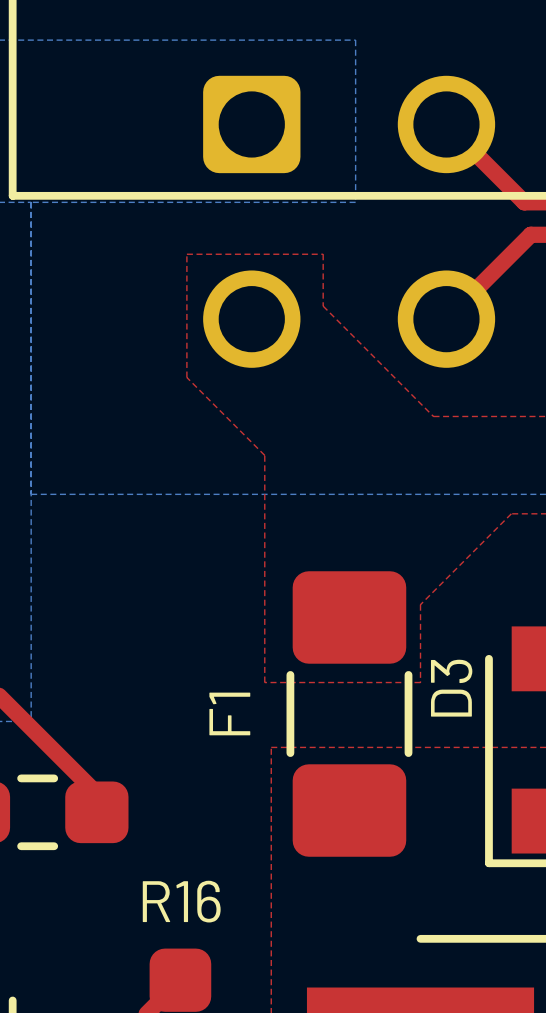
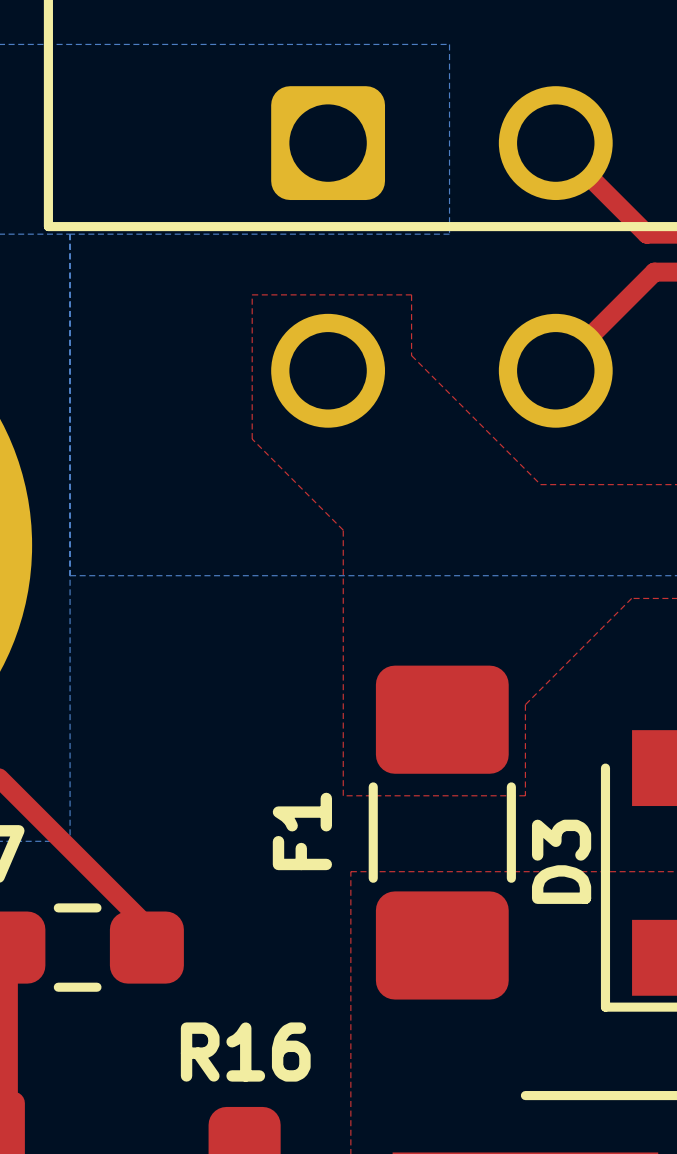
D3 name position: D3 (451, 688) -> D3 (561, 861)

